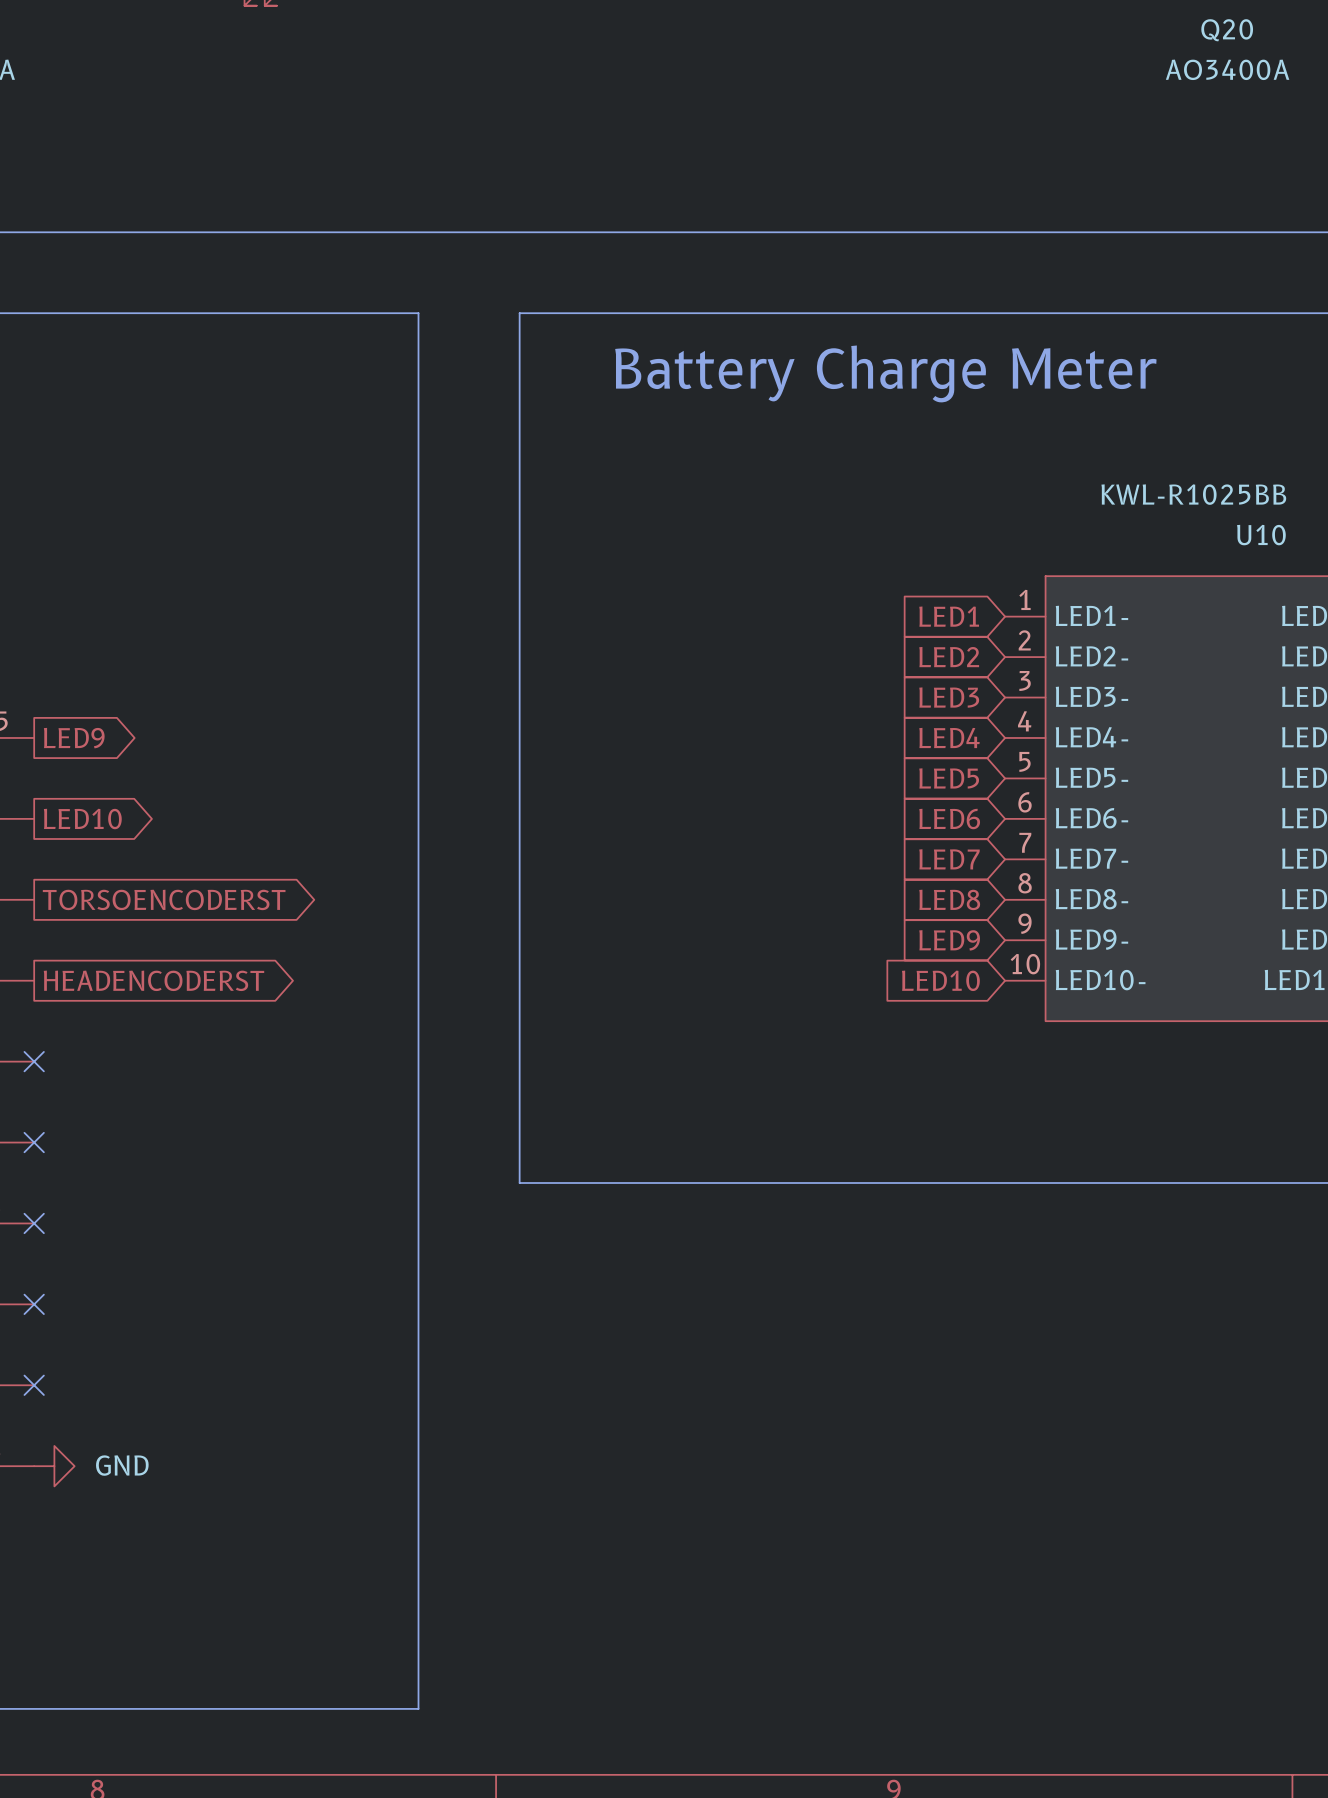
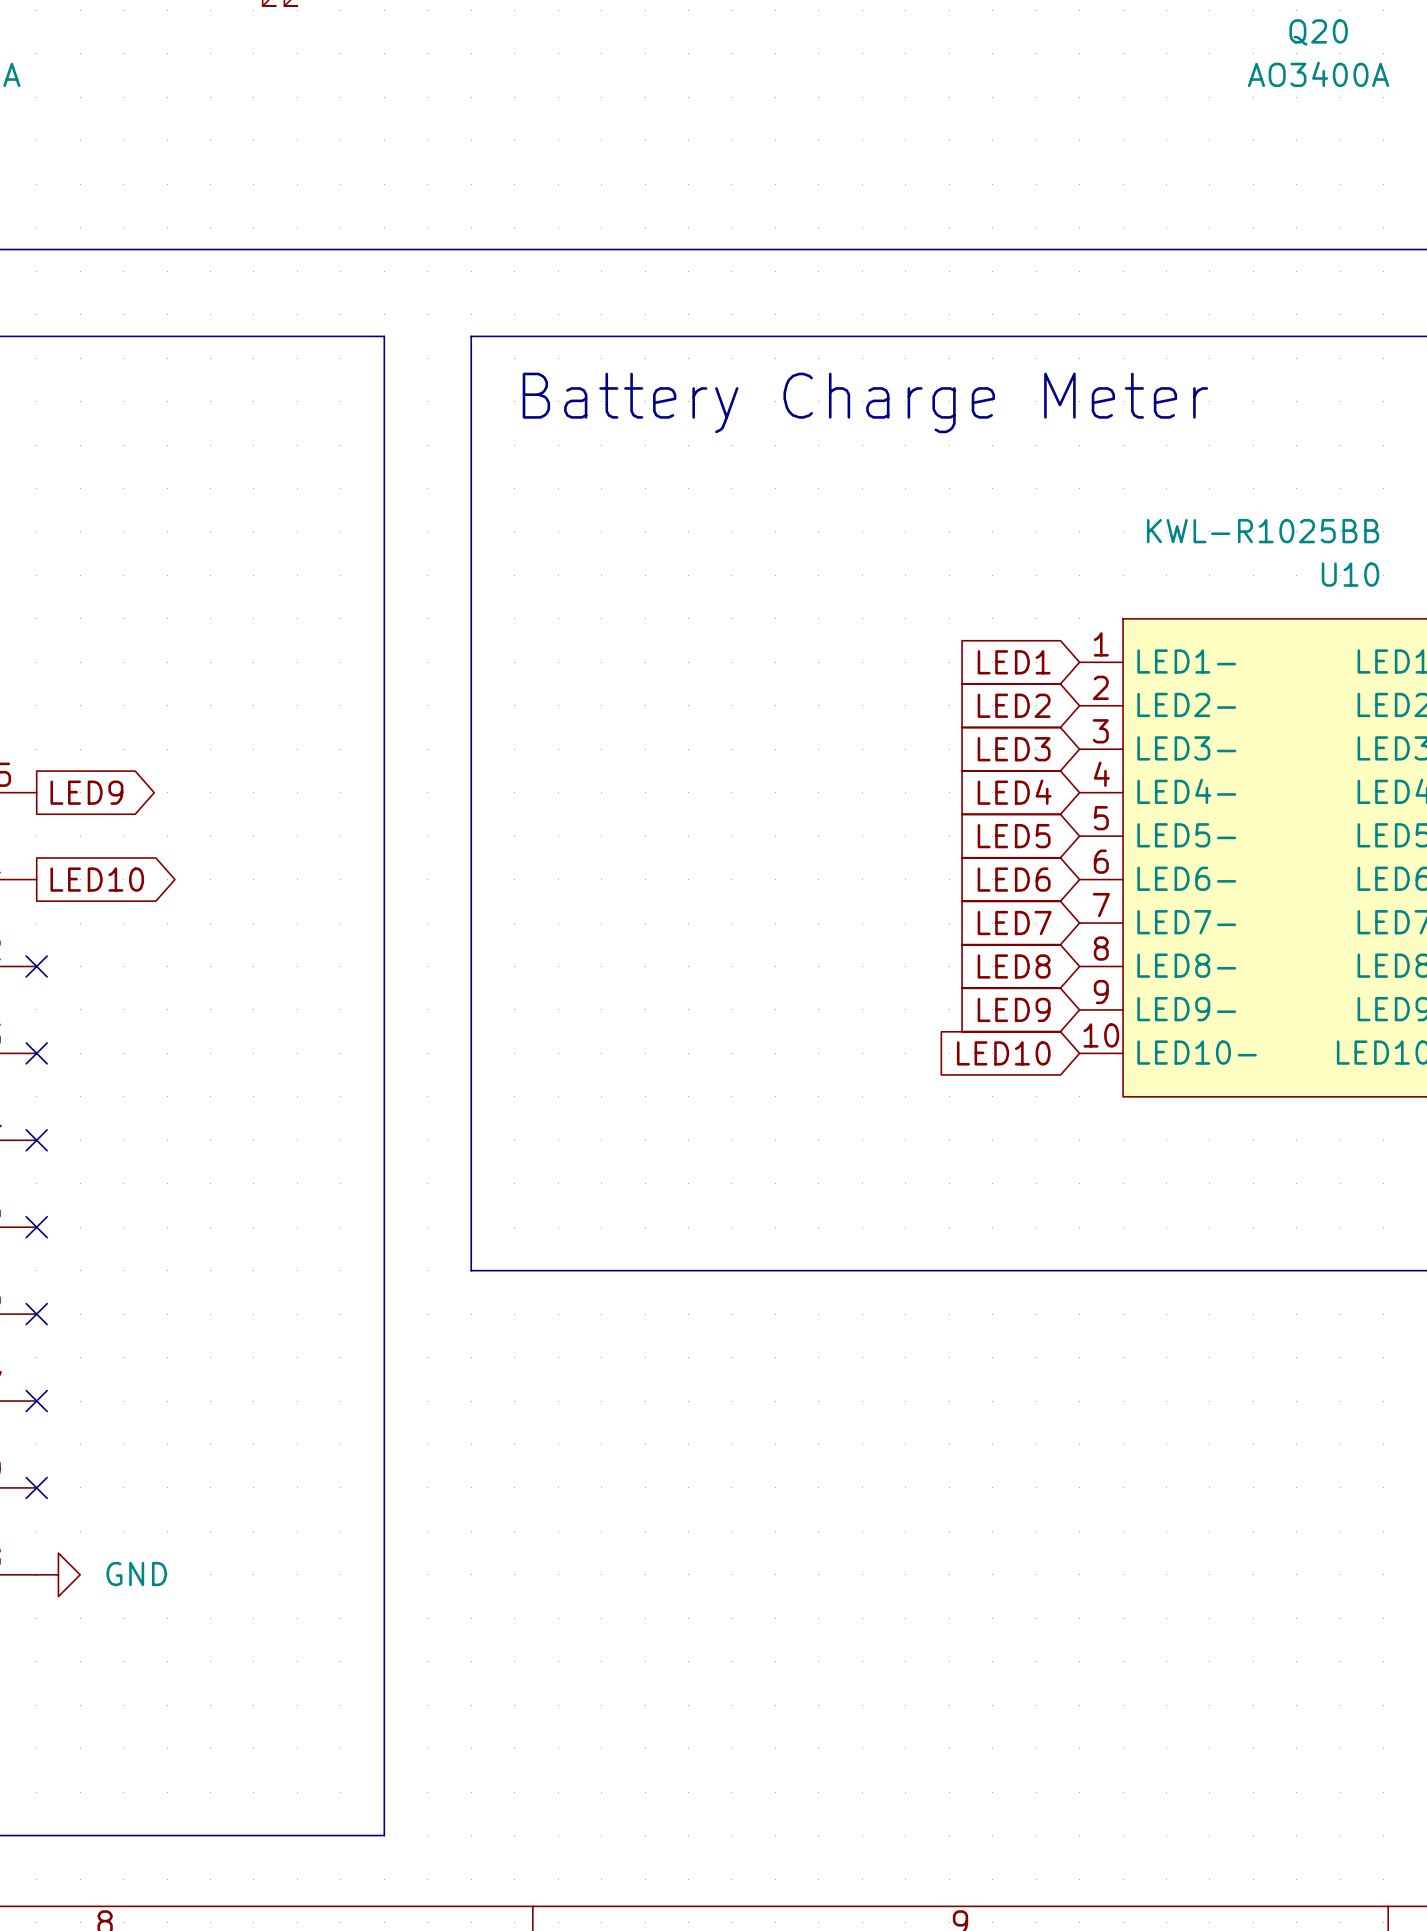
line: (357, 313) (418, 313) (418, 1708) (357, 1708) -> (384, 336) (384, 1835)
line: (519, 313) (519, 1183) -> (558, 336) (471, 336) (471, 1270) (558, 1270)
text position: Battery Charge Meter (885, 373) -> Battery Charge Meter (865, 402)
no-connect mark: none -> (36, 966)
global label: TORSOENCODERST (164, 899) -> none
no-connect mark: none -> (36, 1053)
global label: HEADENCODERST (153, 980) -> none

